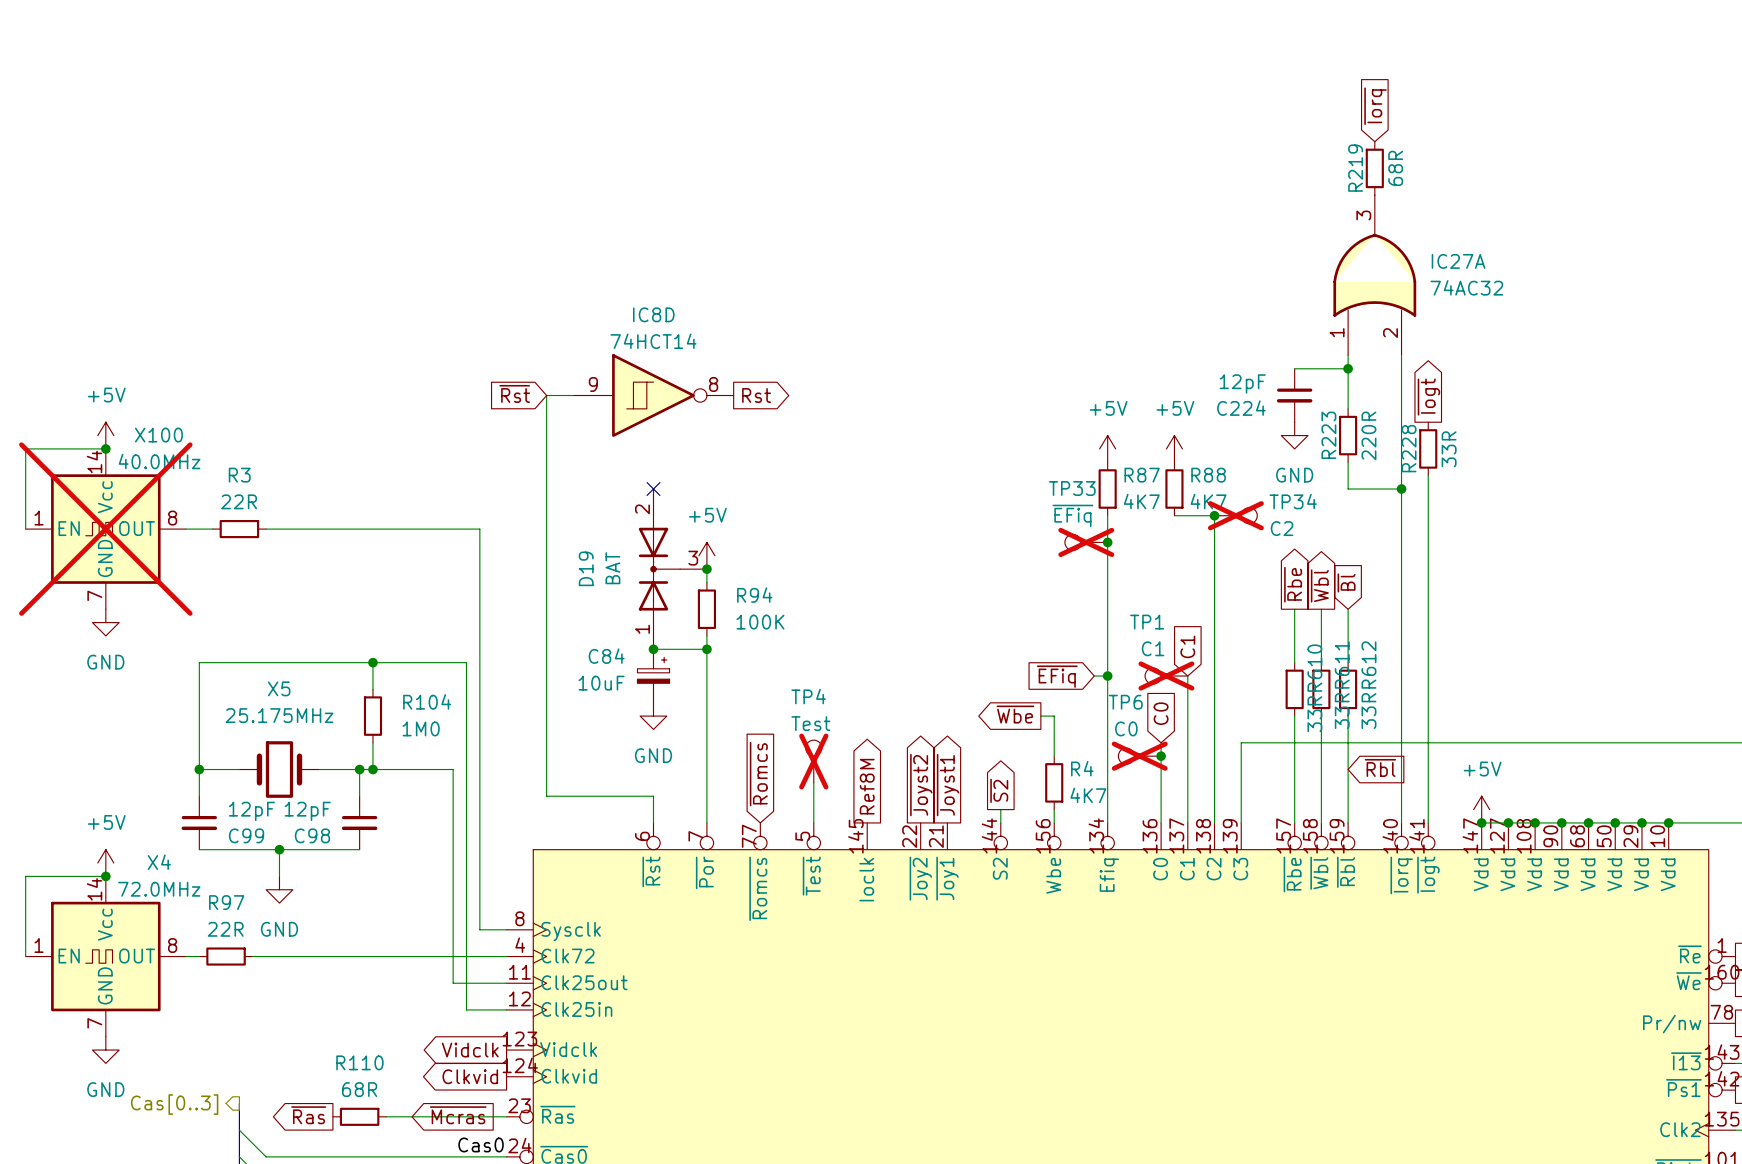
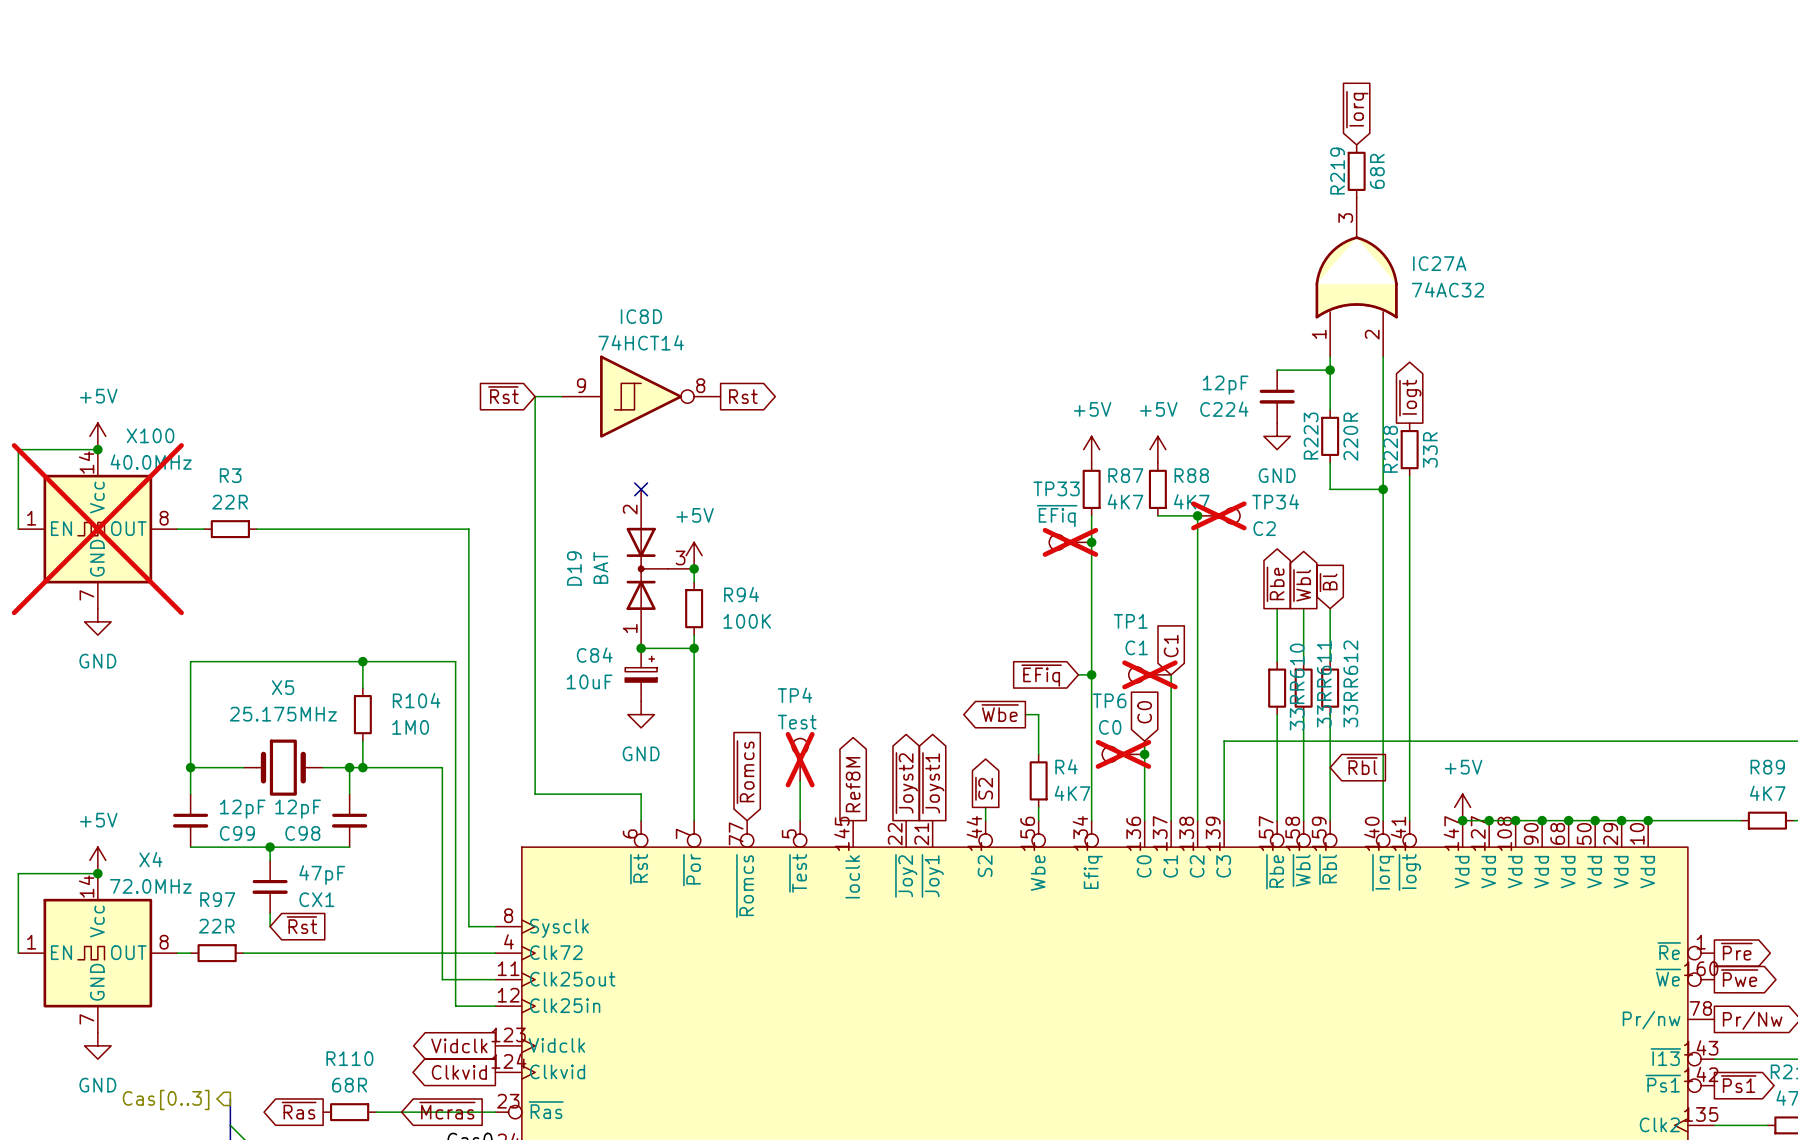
X5 position: (279, 769) -> (283, 767)
CX1: none -> 47pF (270, 886)
power symbol: GND (279, 889) -> none
global label: none -> ~{Rst} (301, 925)

